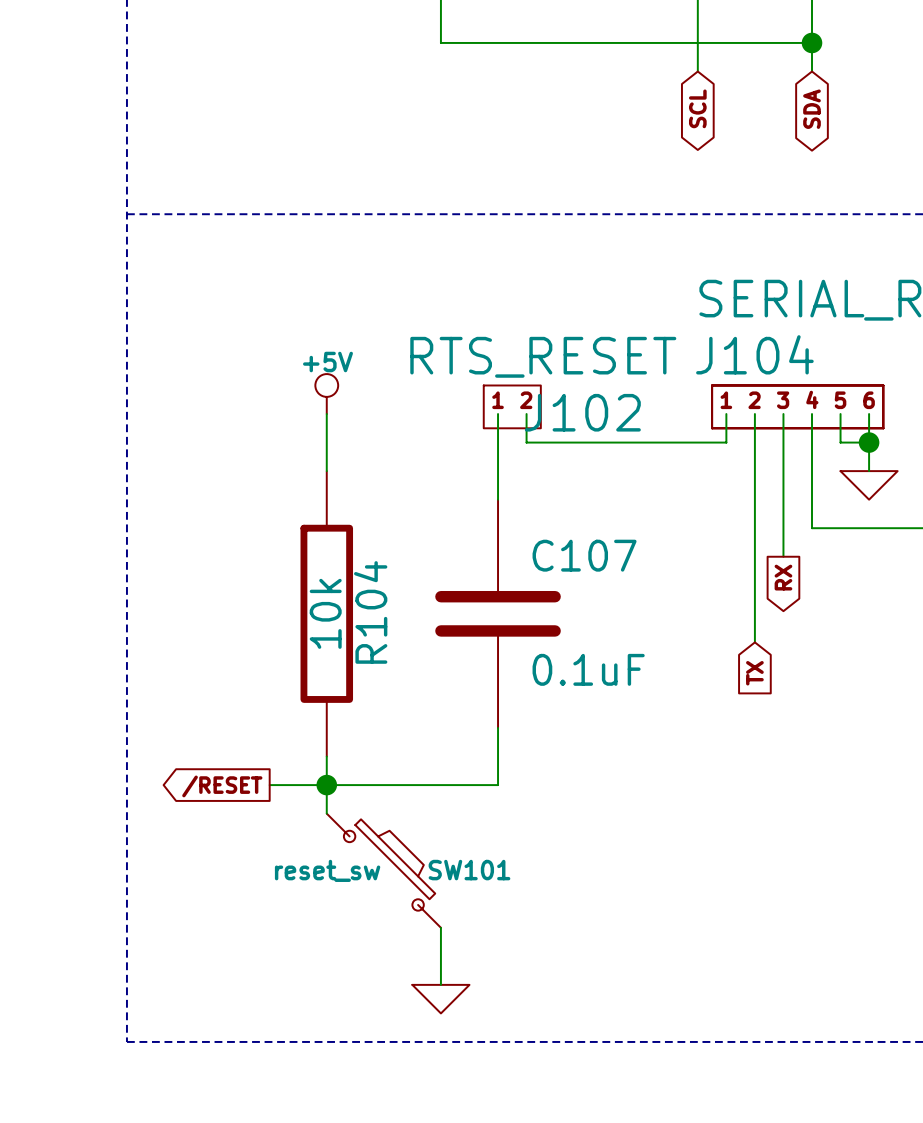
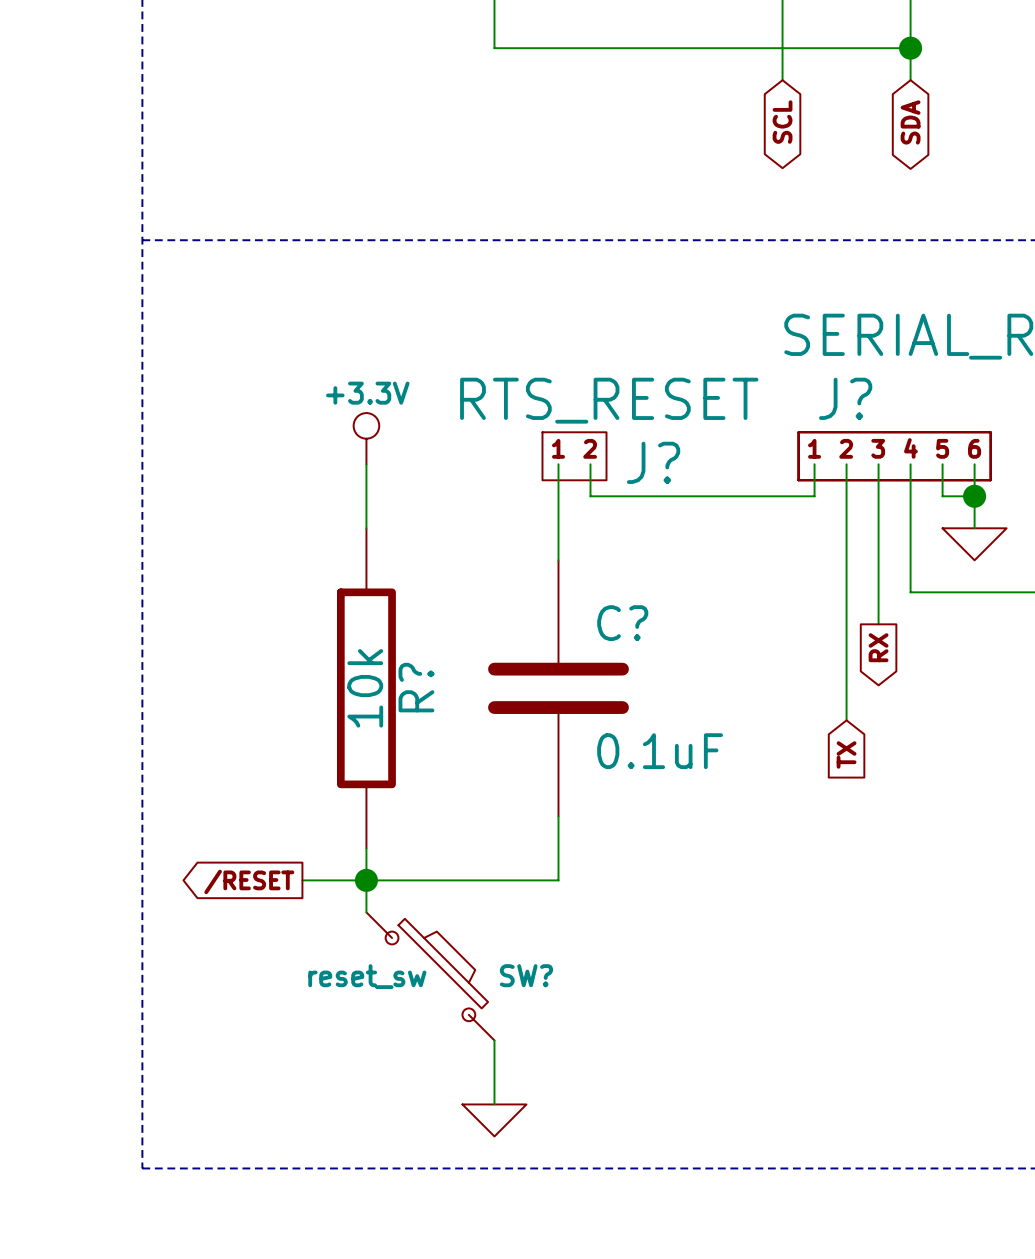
J104 name: J104 (754, 354) -> J? (845, 398)
power symbol: +5V (326, 394) -> +3.3V (366, 438)
J102 name: J102 (582, 412) -> J? (653, 462)
C107 name: C107 (584, 555) -> C? (622, 623)
R104 name: R104 (370, 612) -> R? (416, 687)
SW101 name: SW101 (469, 870) -> SW? (526, 975)

